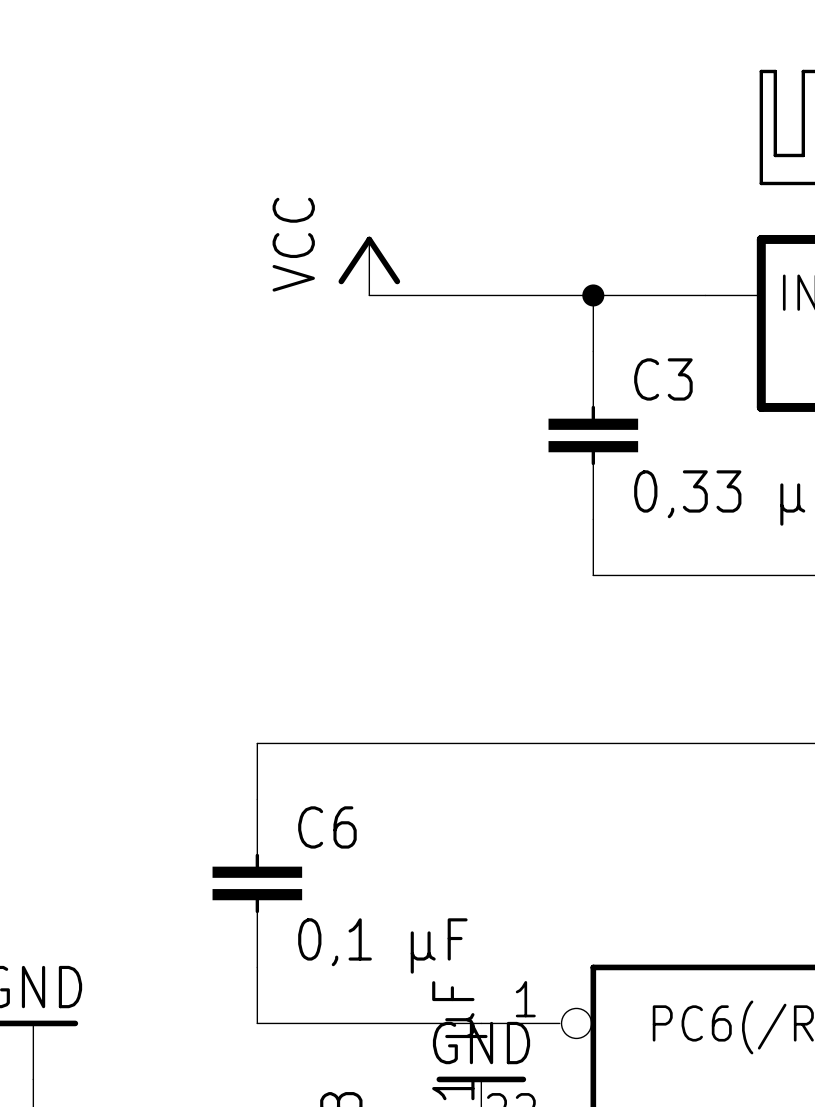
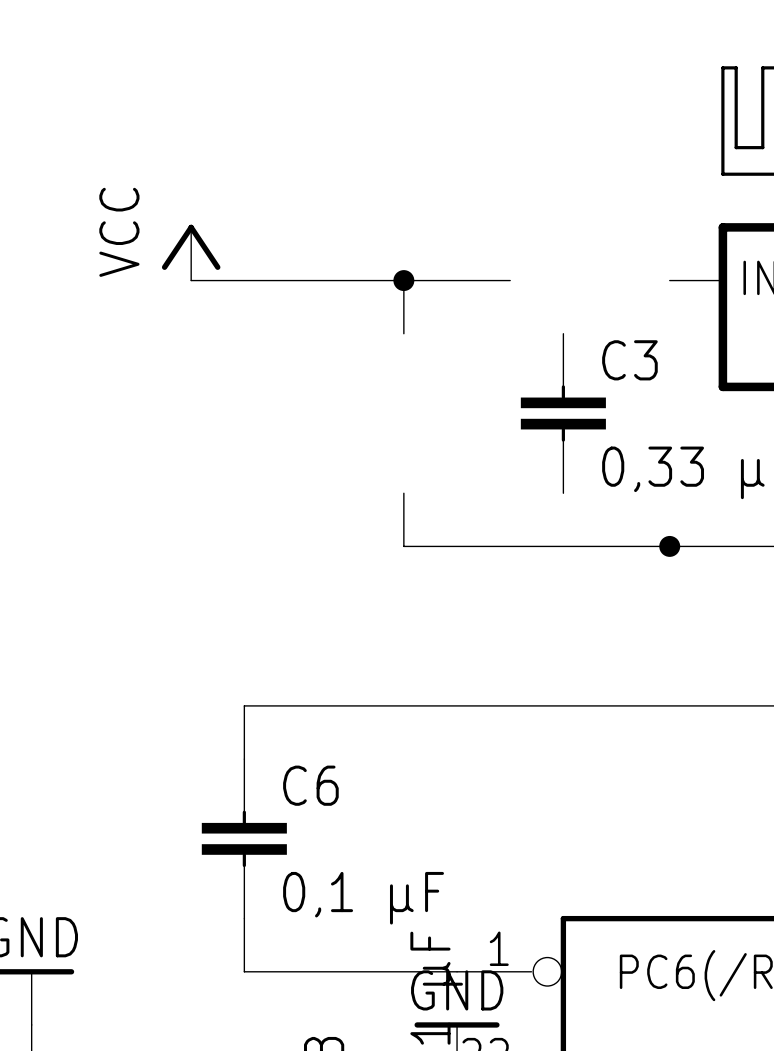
power symbol position: VCC (369, 266) -> VCC (191, 252)
junction: none -> (403, 280)
wire: (537, 295) (705, 295) -> (191, 280) (350, 280)
wire: (593, 295) (593, 351) -> (403, 280) (403, 333)
junction: (593, 295) -> none
wire: (593, 519) (593, 575) -> (403, 493) (403, 546) (563, 546)
junction: none -> (669, 546)

